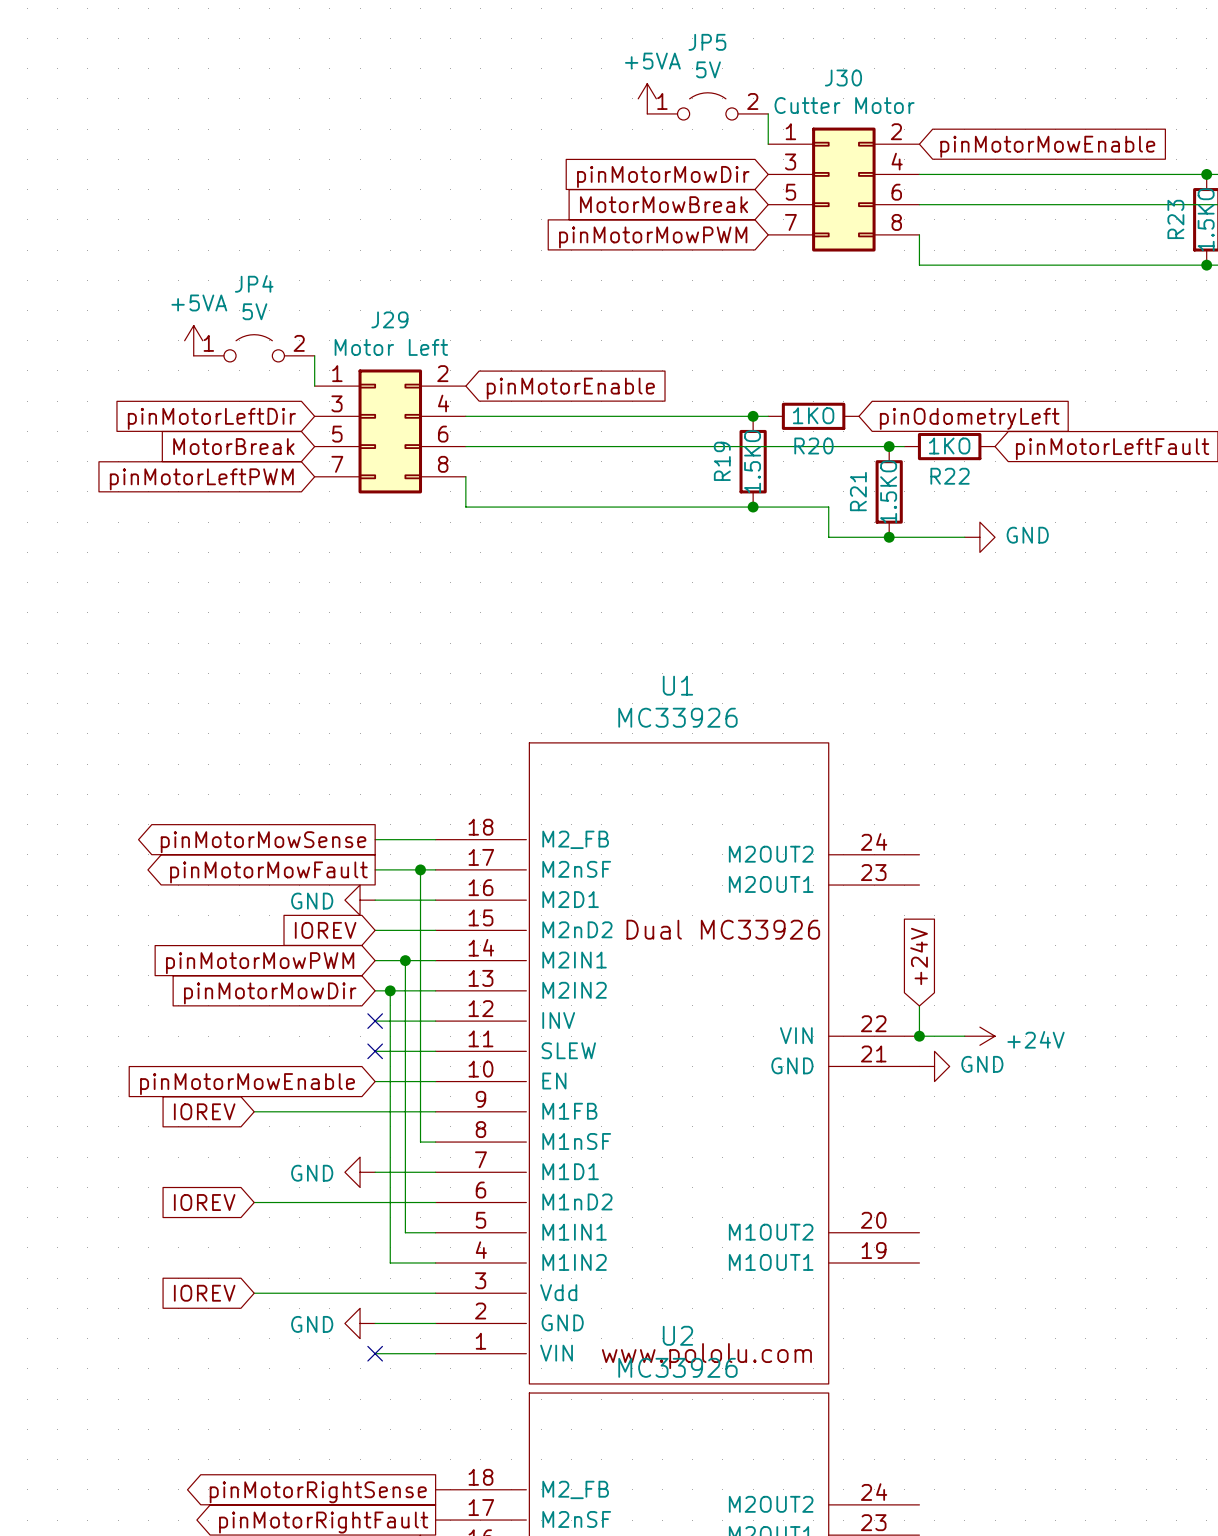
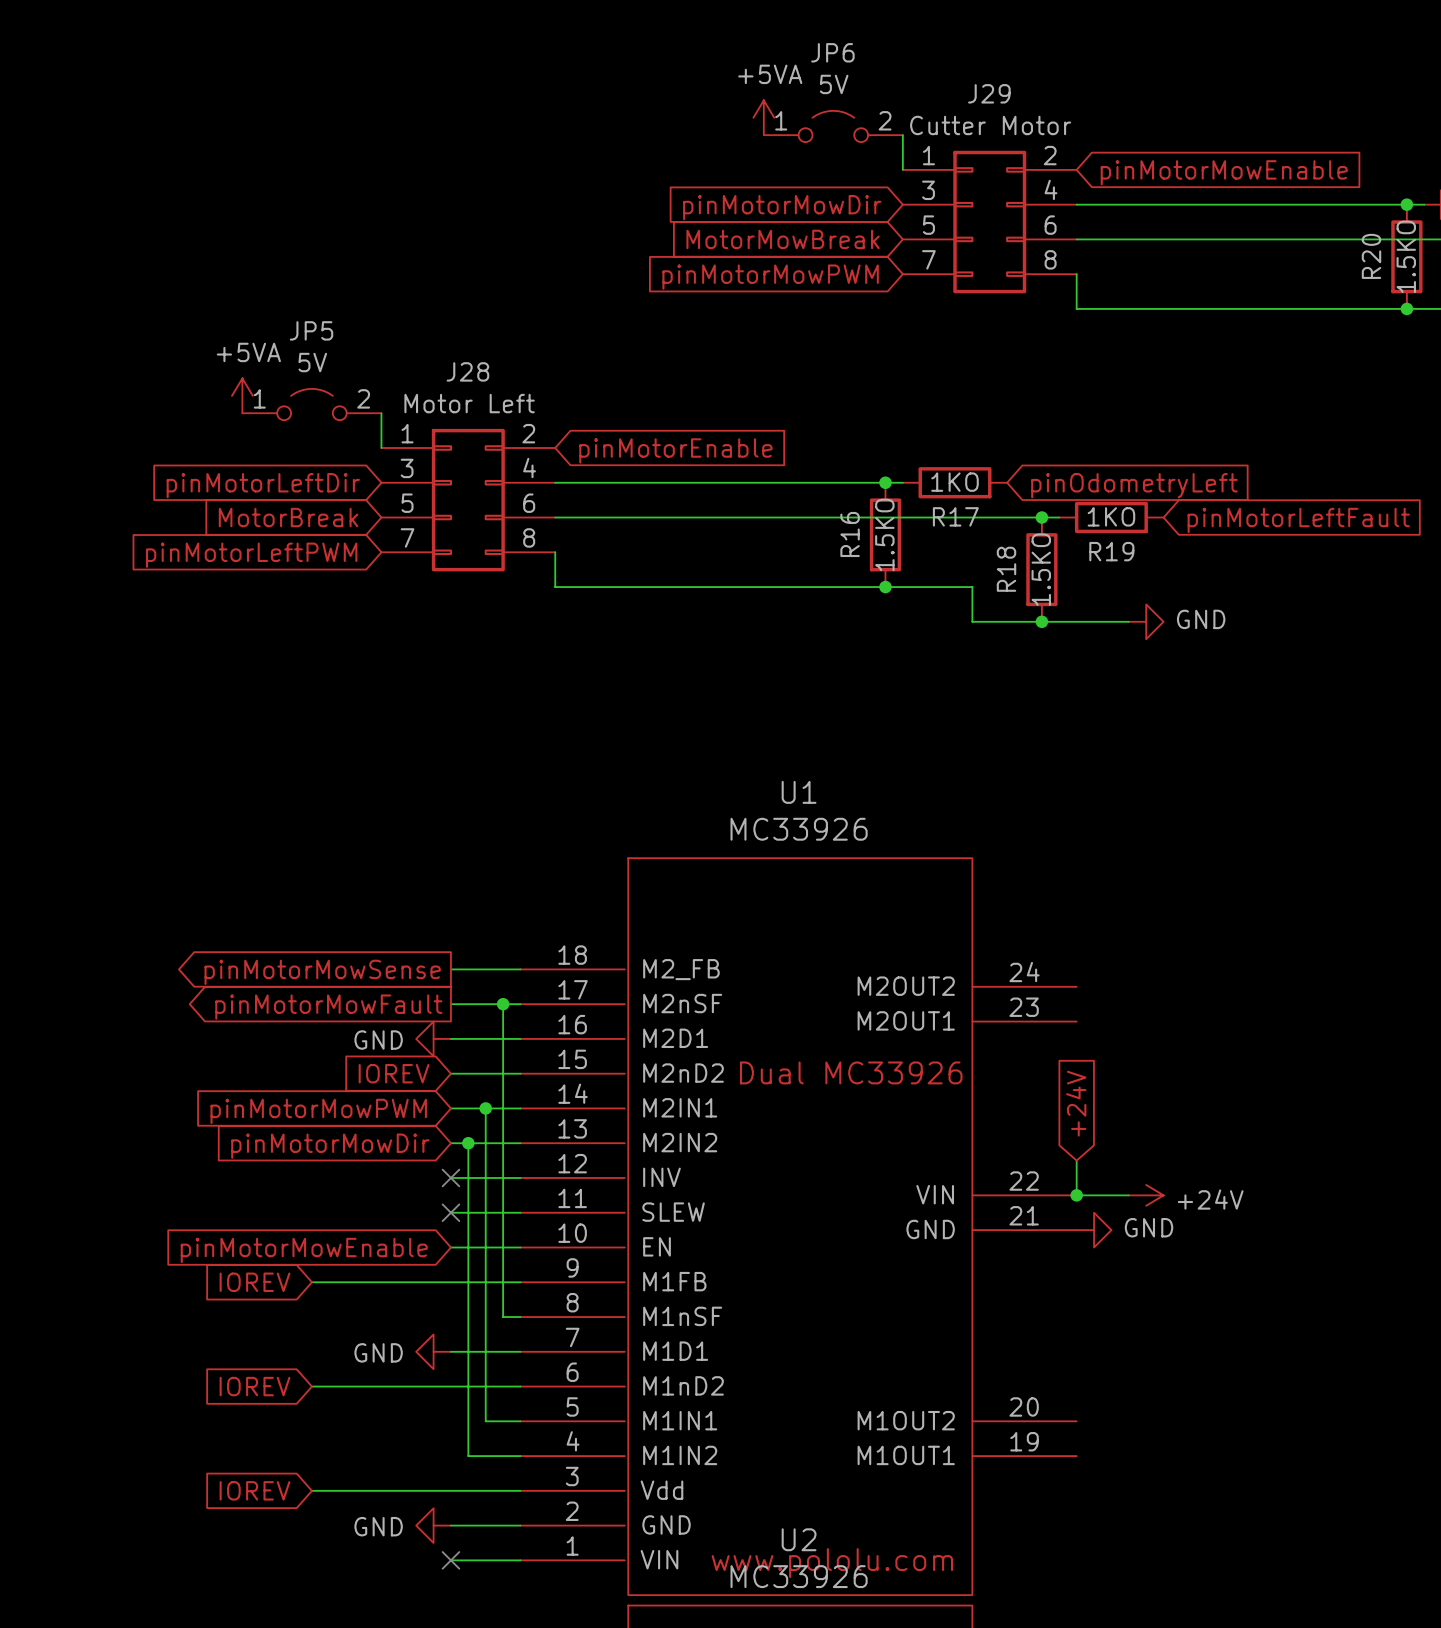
JP5 name: JP5 (707, 42) -> JP6 (832, 52)
J30 name: J30 (843, 78) -> J29 (989, 93)
R23 name: R23 (1175, 219) -> R20 (1371, 256)
JP4 name: JP4 (254, 283) -> JP5 (311, 330)
J29 name: J29 (389, 319) -> J28 (467, 371)
R20 name: R20 (813, 446) -> R17 (955, 516)
R19 name: R19 (722, 461) -> R16 (850, 534)
R22 name: R22 (950, 476) -> R19 (1111, 551)
R21 name: R21 (858, 491) -> R18 (1006, 569)

